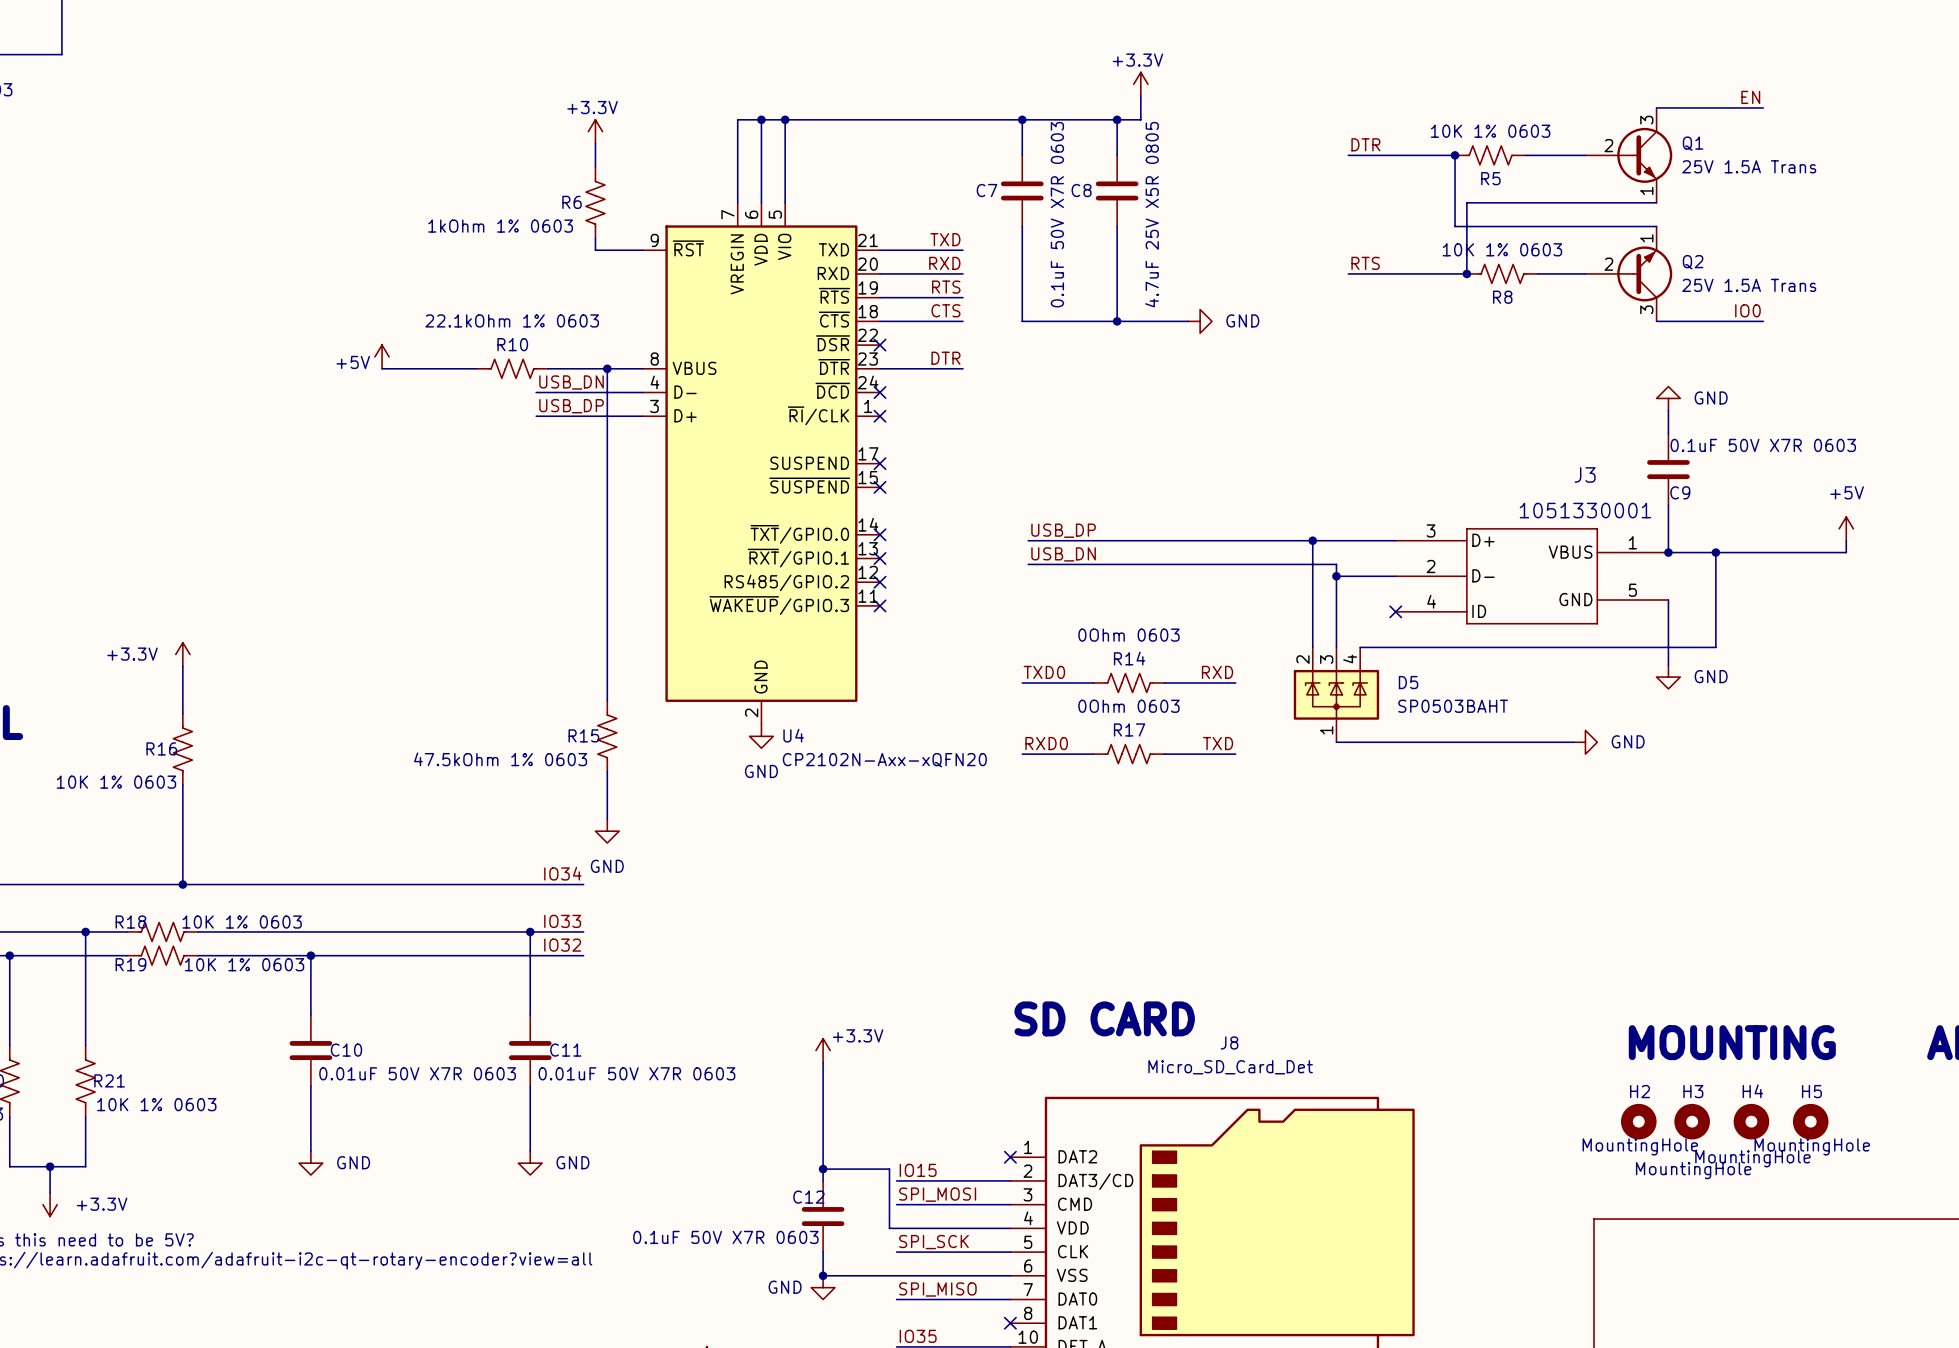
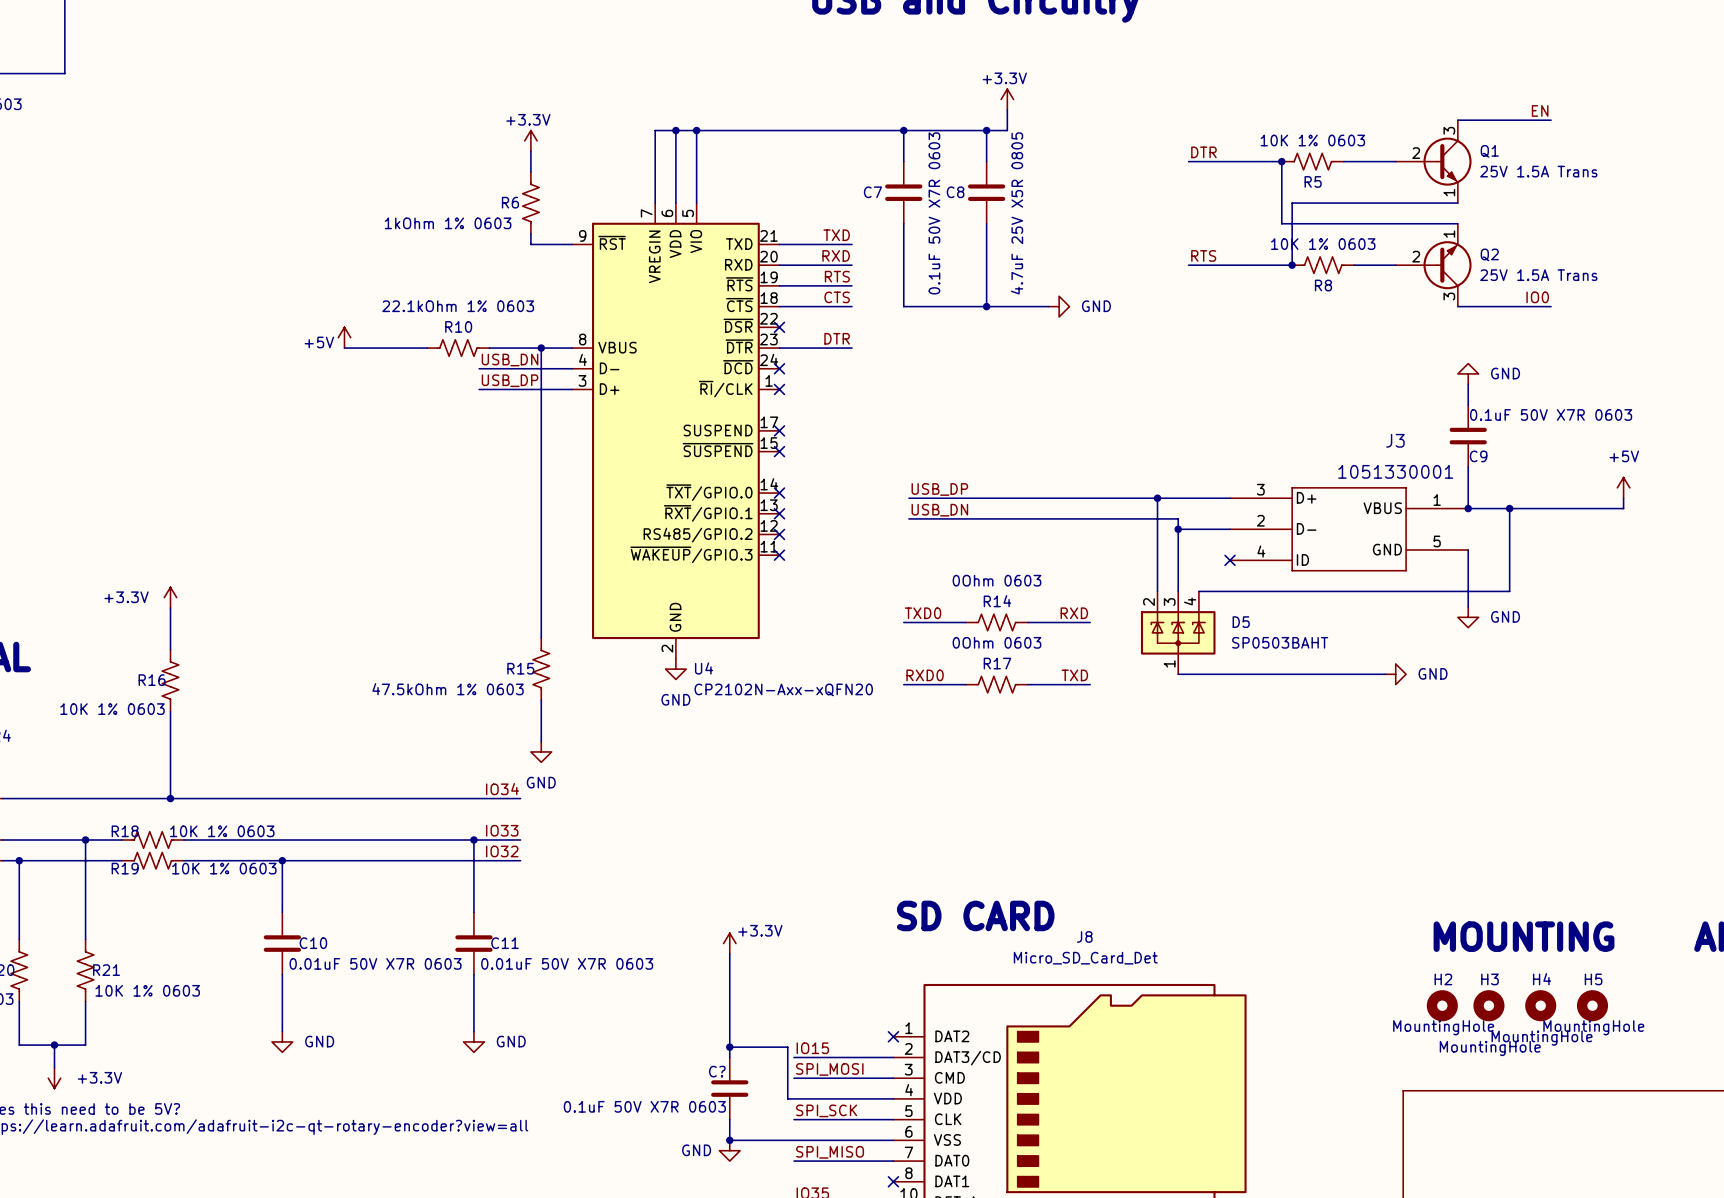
C12 name: C12 (808, 1197) -> C? (717, 1071)

